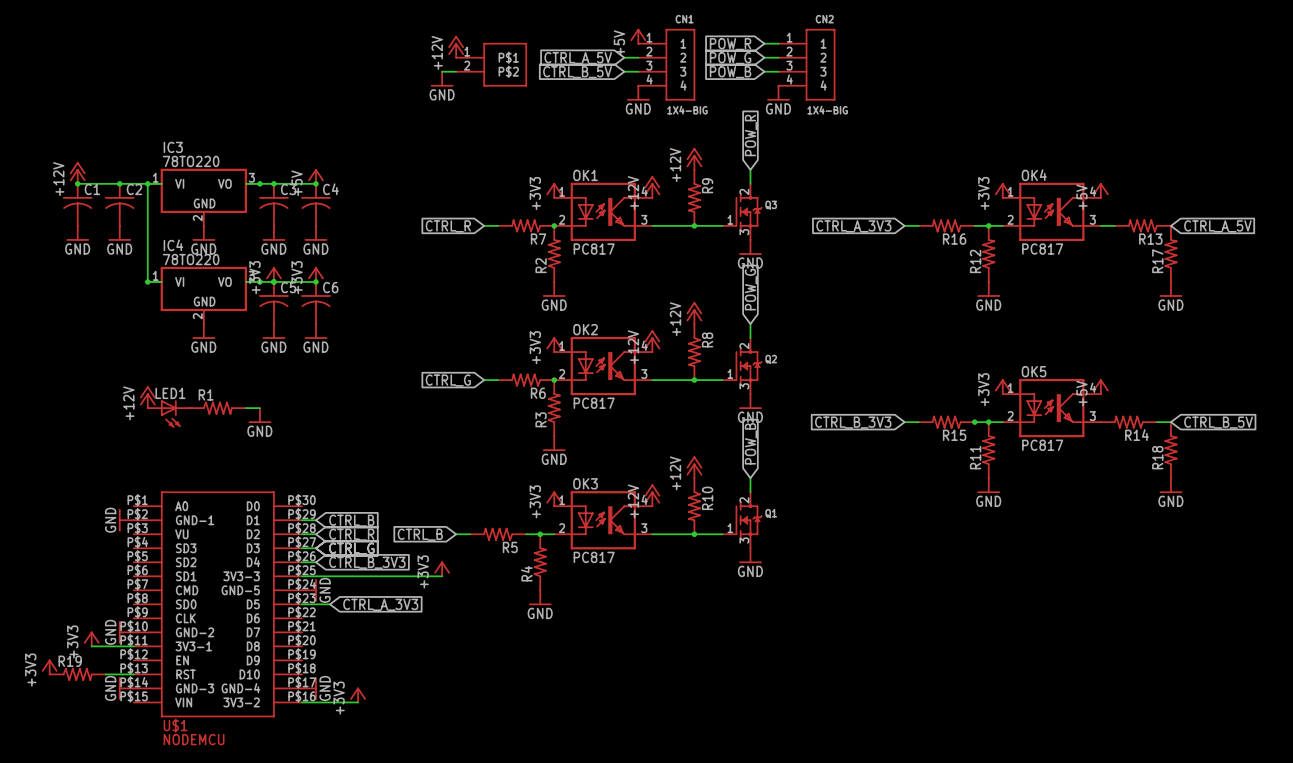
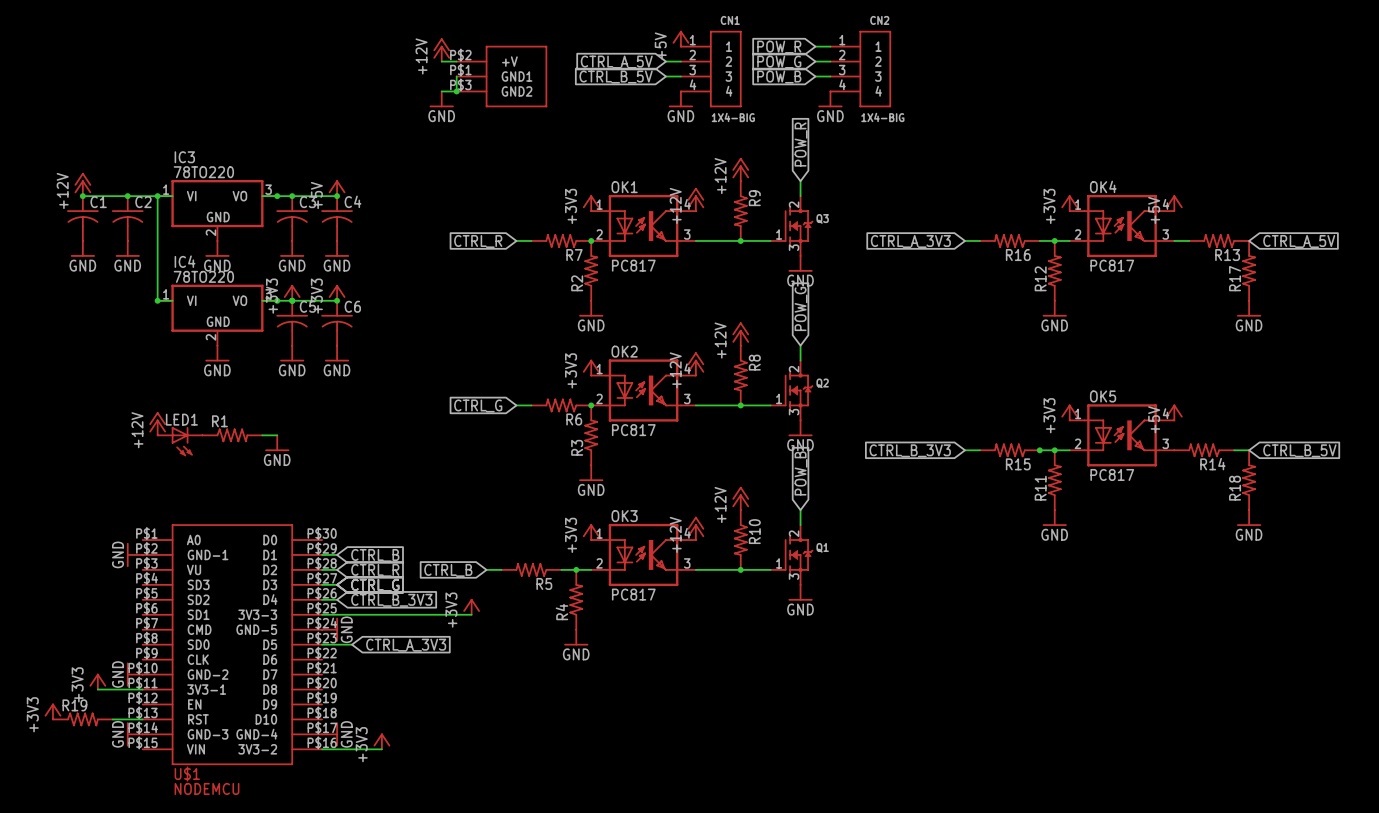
power symbol position: +12V (456, 46) -> +12V (441, 49)
part: (491, 64) -> none
wire: none -> (456, 76) (456, 91) (441, 91)
part: none -> (501, 76)
power symbol position: GND (442, 79) -> GND (441, 99)
junction: none -> (456, 91)

